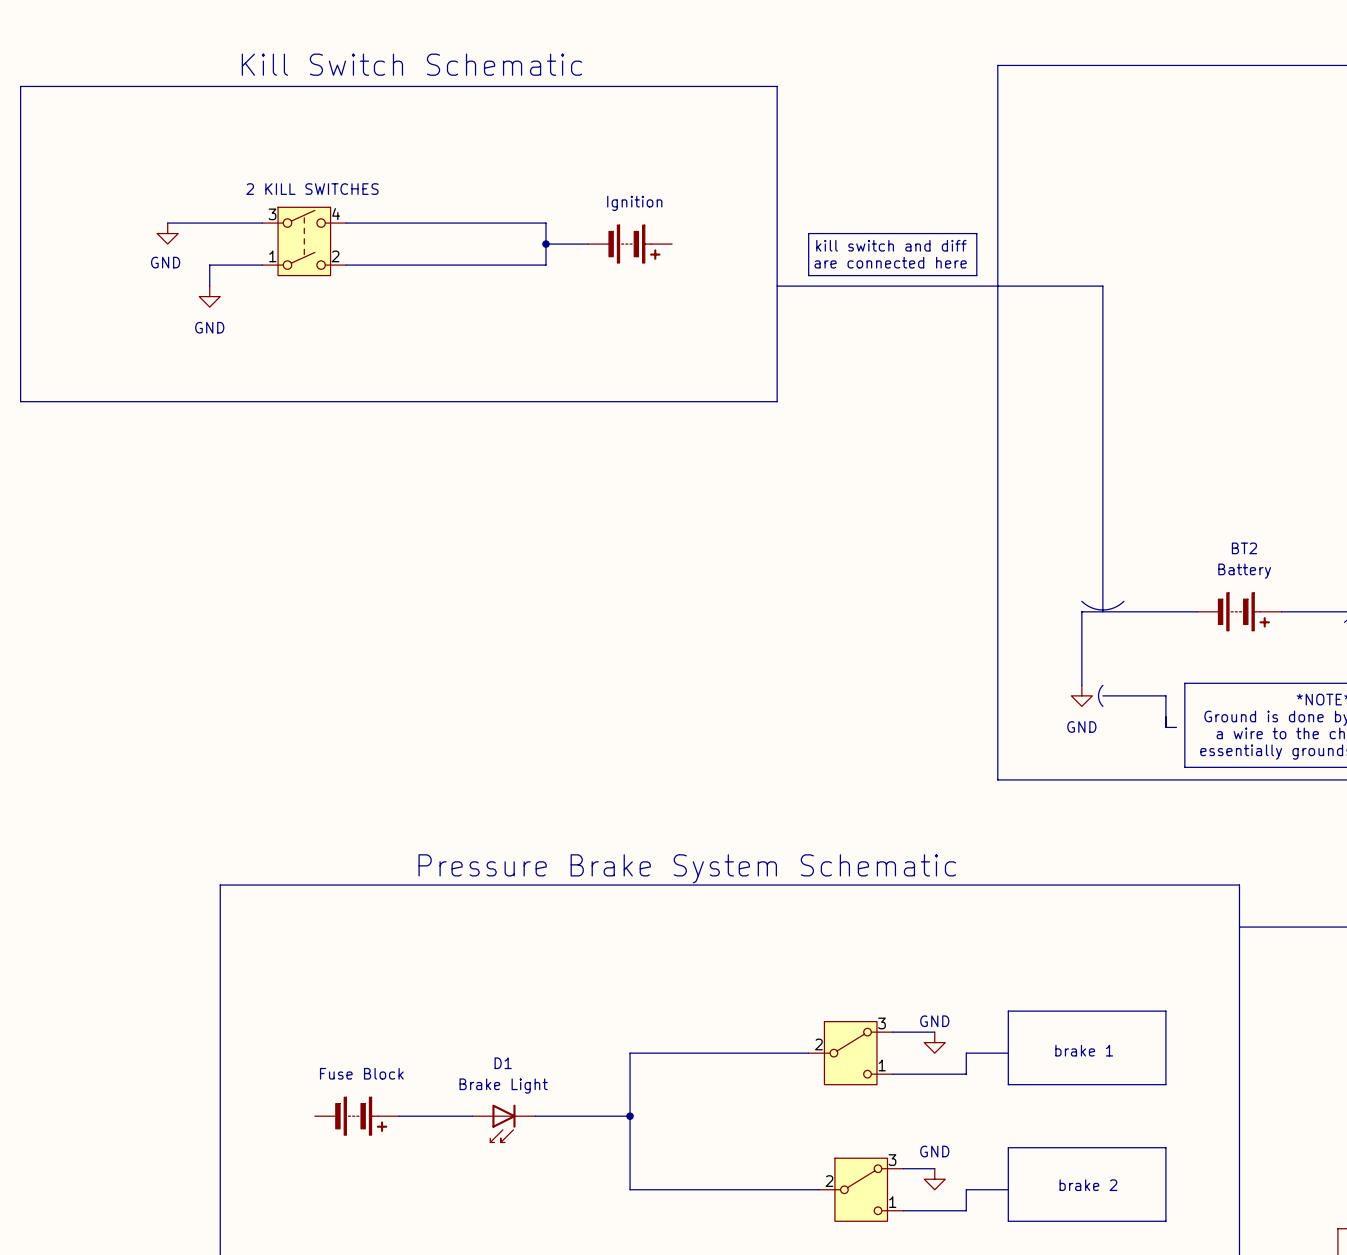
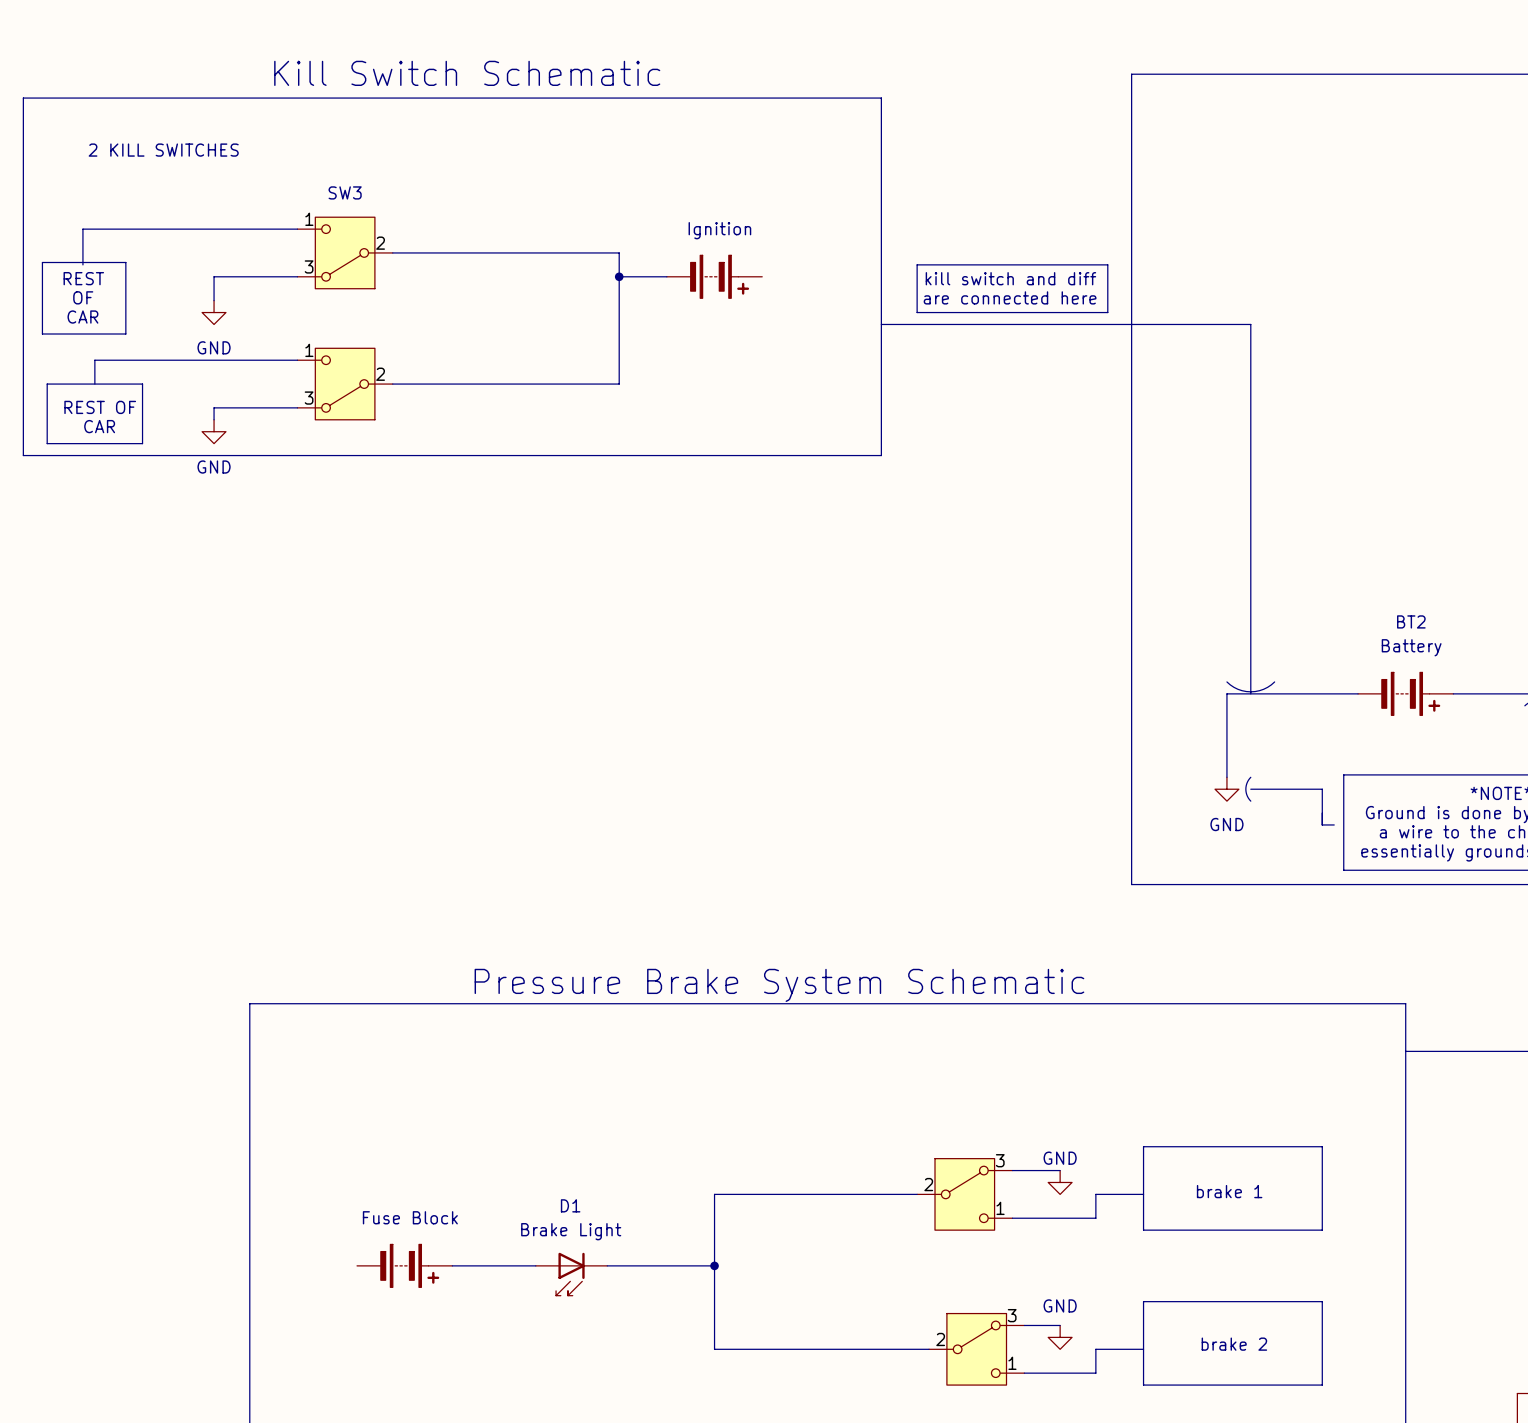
text position: 2 KILL SWITCHES (312, 189) -> 2 KILL SWITCHES (163, 150)
wire: none -> (297, 229) (82, 229) (82, 264)
wire: (167, 223) (262, 223) -> none
SW3: none -> (345, 252)
line: none -> (42, 262) (125, 262) (125, 334) (42, 334) (42, 262)
power symbol: GND (167, 233) -> none
part: (304, 241) -> none
wire: none -> (297, 276) (214, 276) (214, 300)
text: none -> REST (83, 278)
text: none -> OF (83, 297)
wire: (262, 265) (209, 265) (209, 286) -> none
wire: (346, 265) (545, 265) -> (392, 384) (619, 384) (619, 300)
power symbol: none -> GND (214, 312)
text: none -> CAR (82, 317)
power symbol: GND (209, 296) -> none
wire: none -> (297, 360) (94, 360) (94, 384)
line: none -> (47, 384) (142, 384) (142, 443) (47, 443) (47, 384)
part: none -> (345, 384)
text: none -> REST OF (100, 407)
wire: none -> (297, 407) (214, 407) (214, 419)
text: none -> CAR (99, 426)
power symbol: none -> GND (214, 431)

